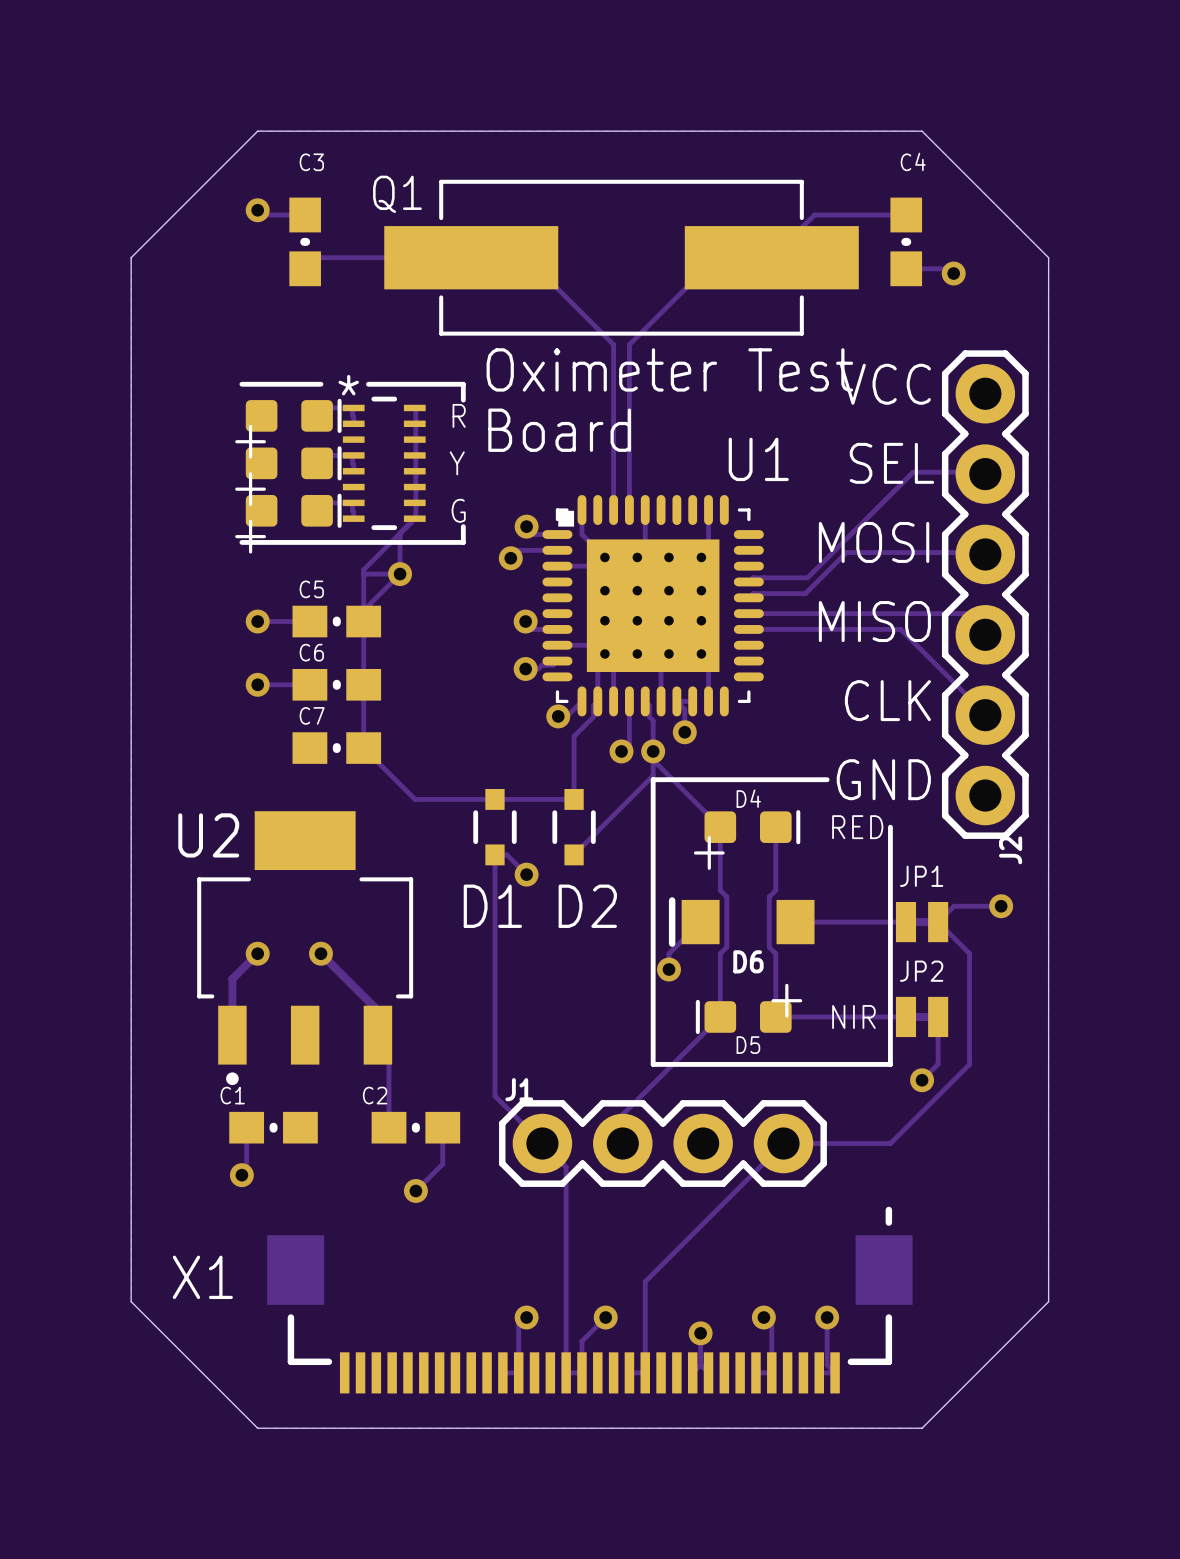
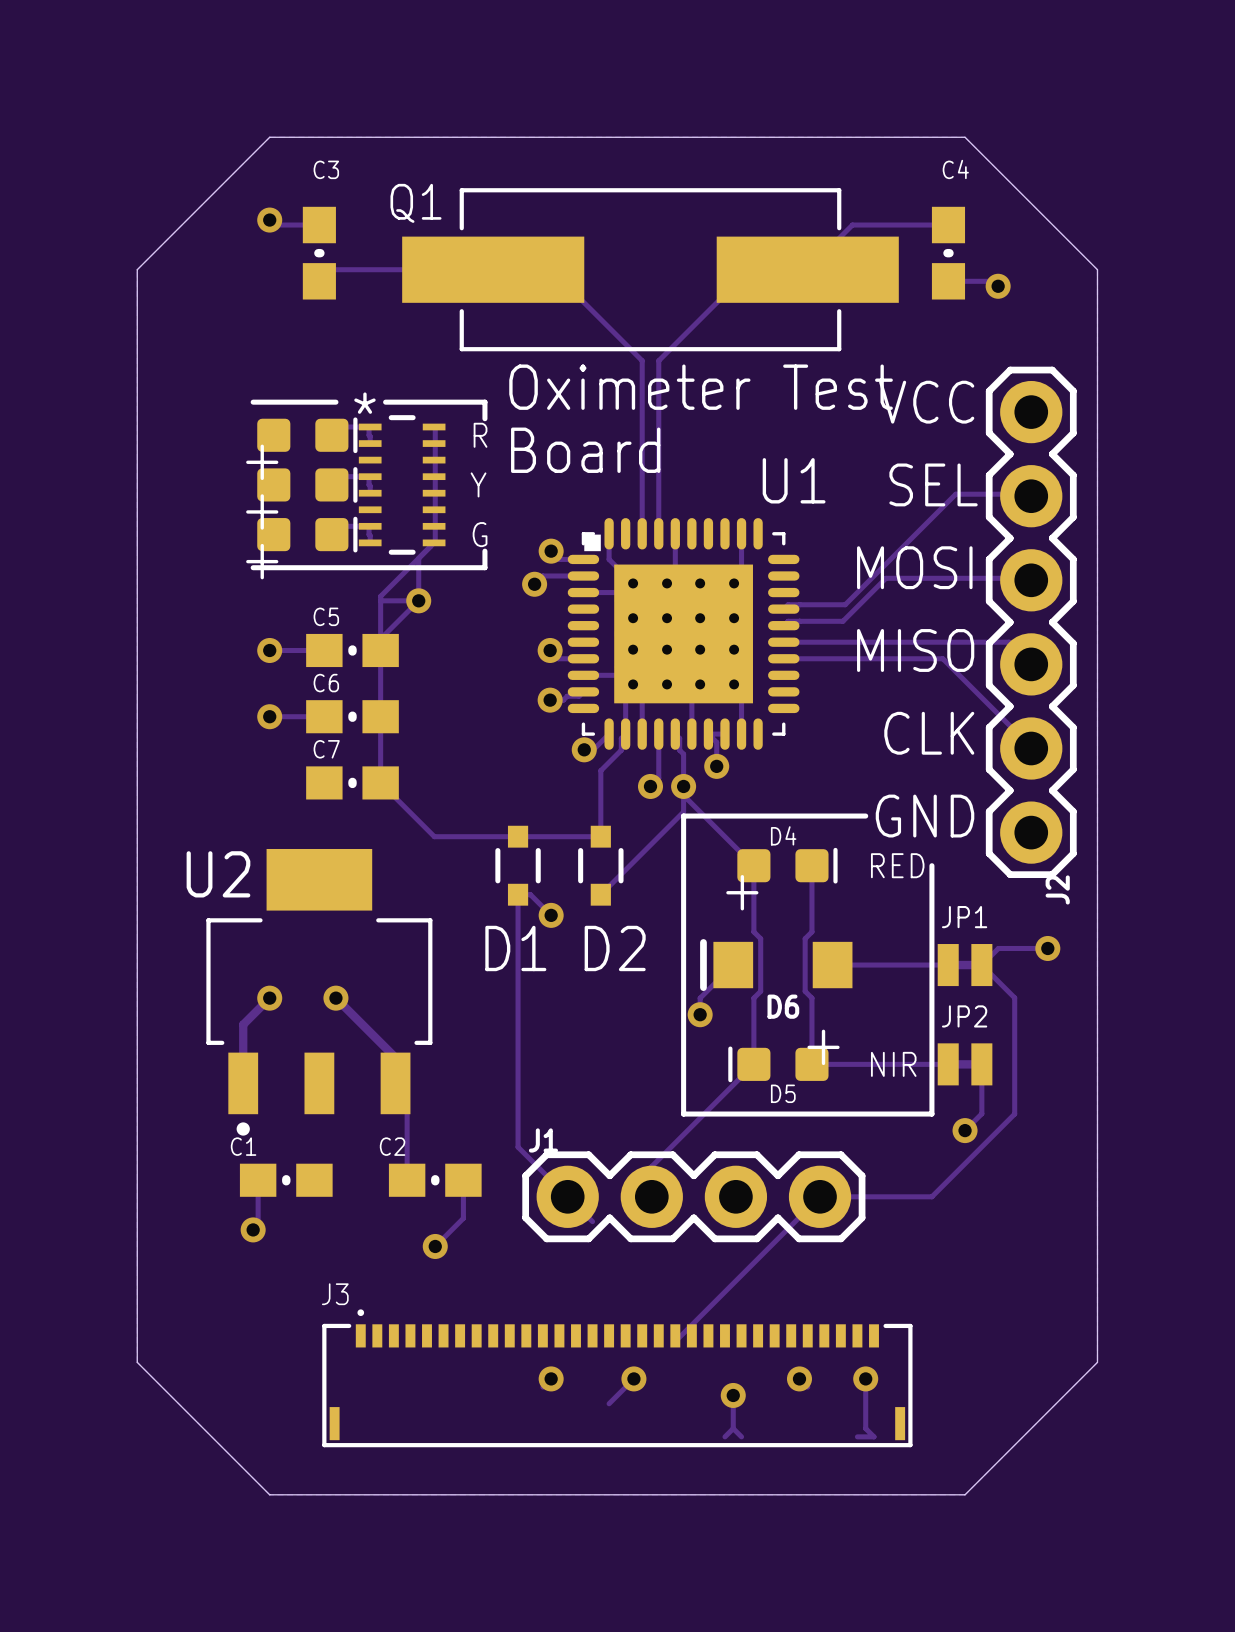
track: (566, 1167) (566, 1372) (581, 1372) (581, 1341) -> none
track: (645, 1281) (645, 1372) (629, 1372) -> none
X1: (589, 1300) -> none
J3: none -> (617, 1378)
track: (518, 1325) (518, 1372) (502, 1372) -> none
track: (771, 1325) (771, 1372) (755, 1372) -> none

